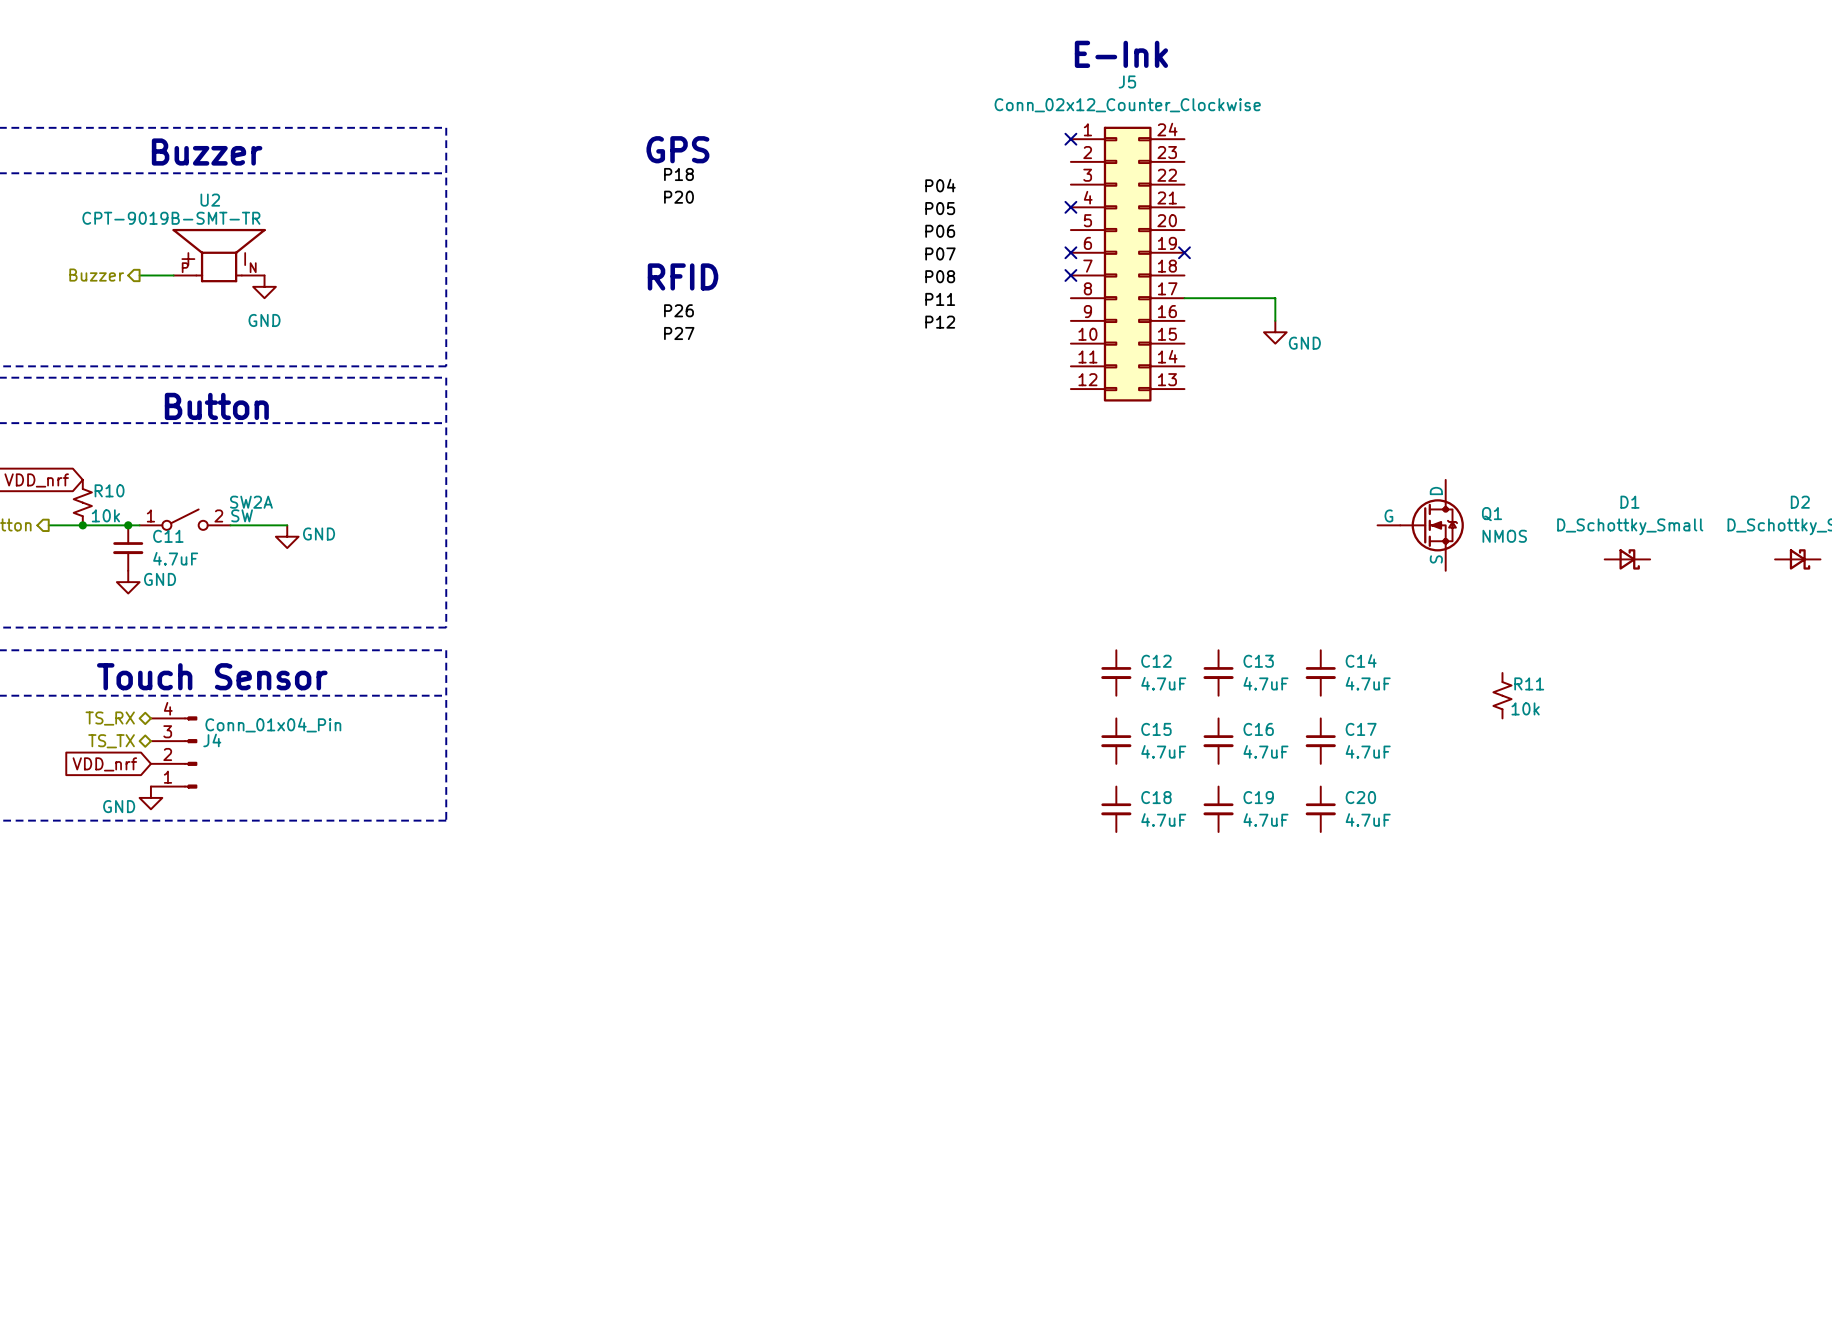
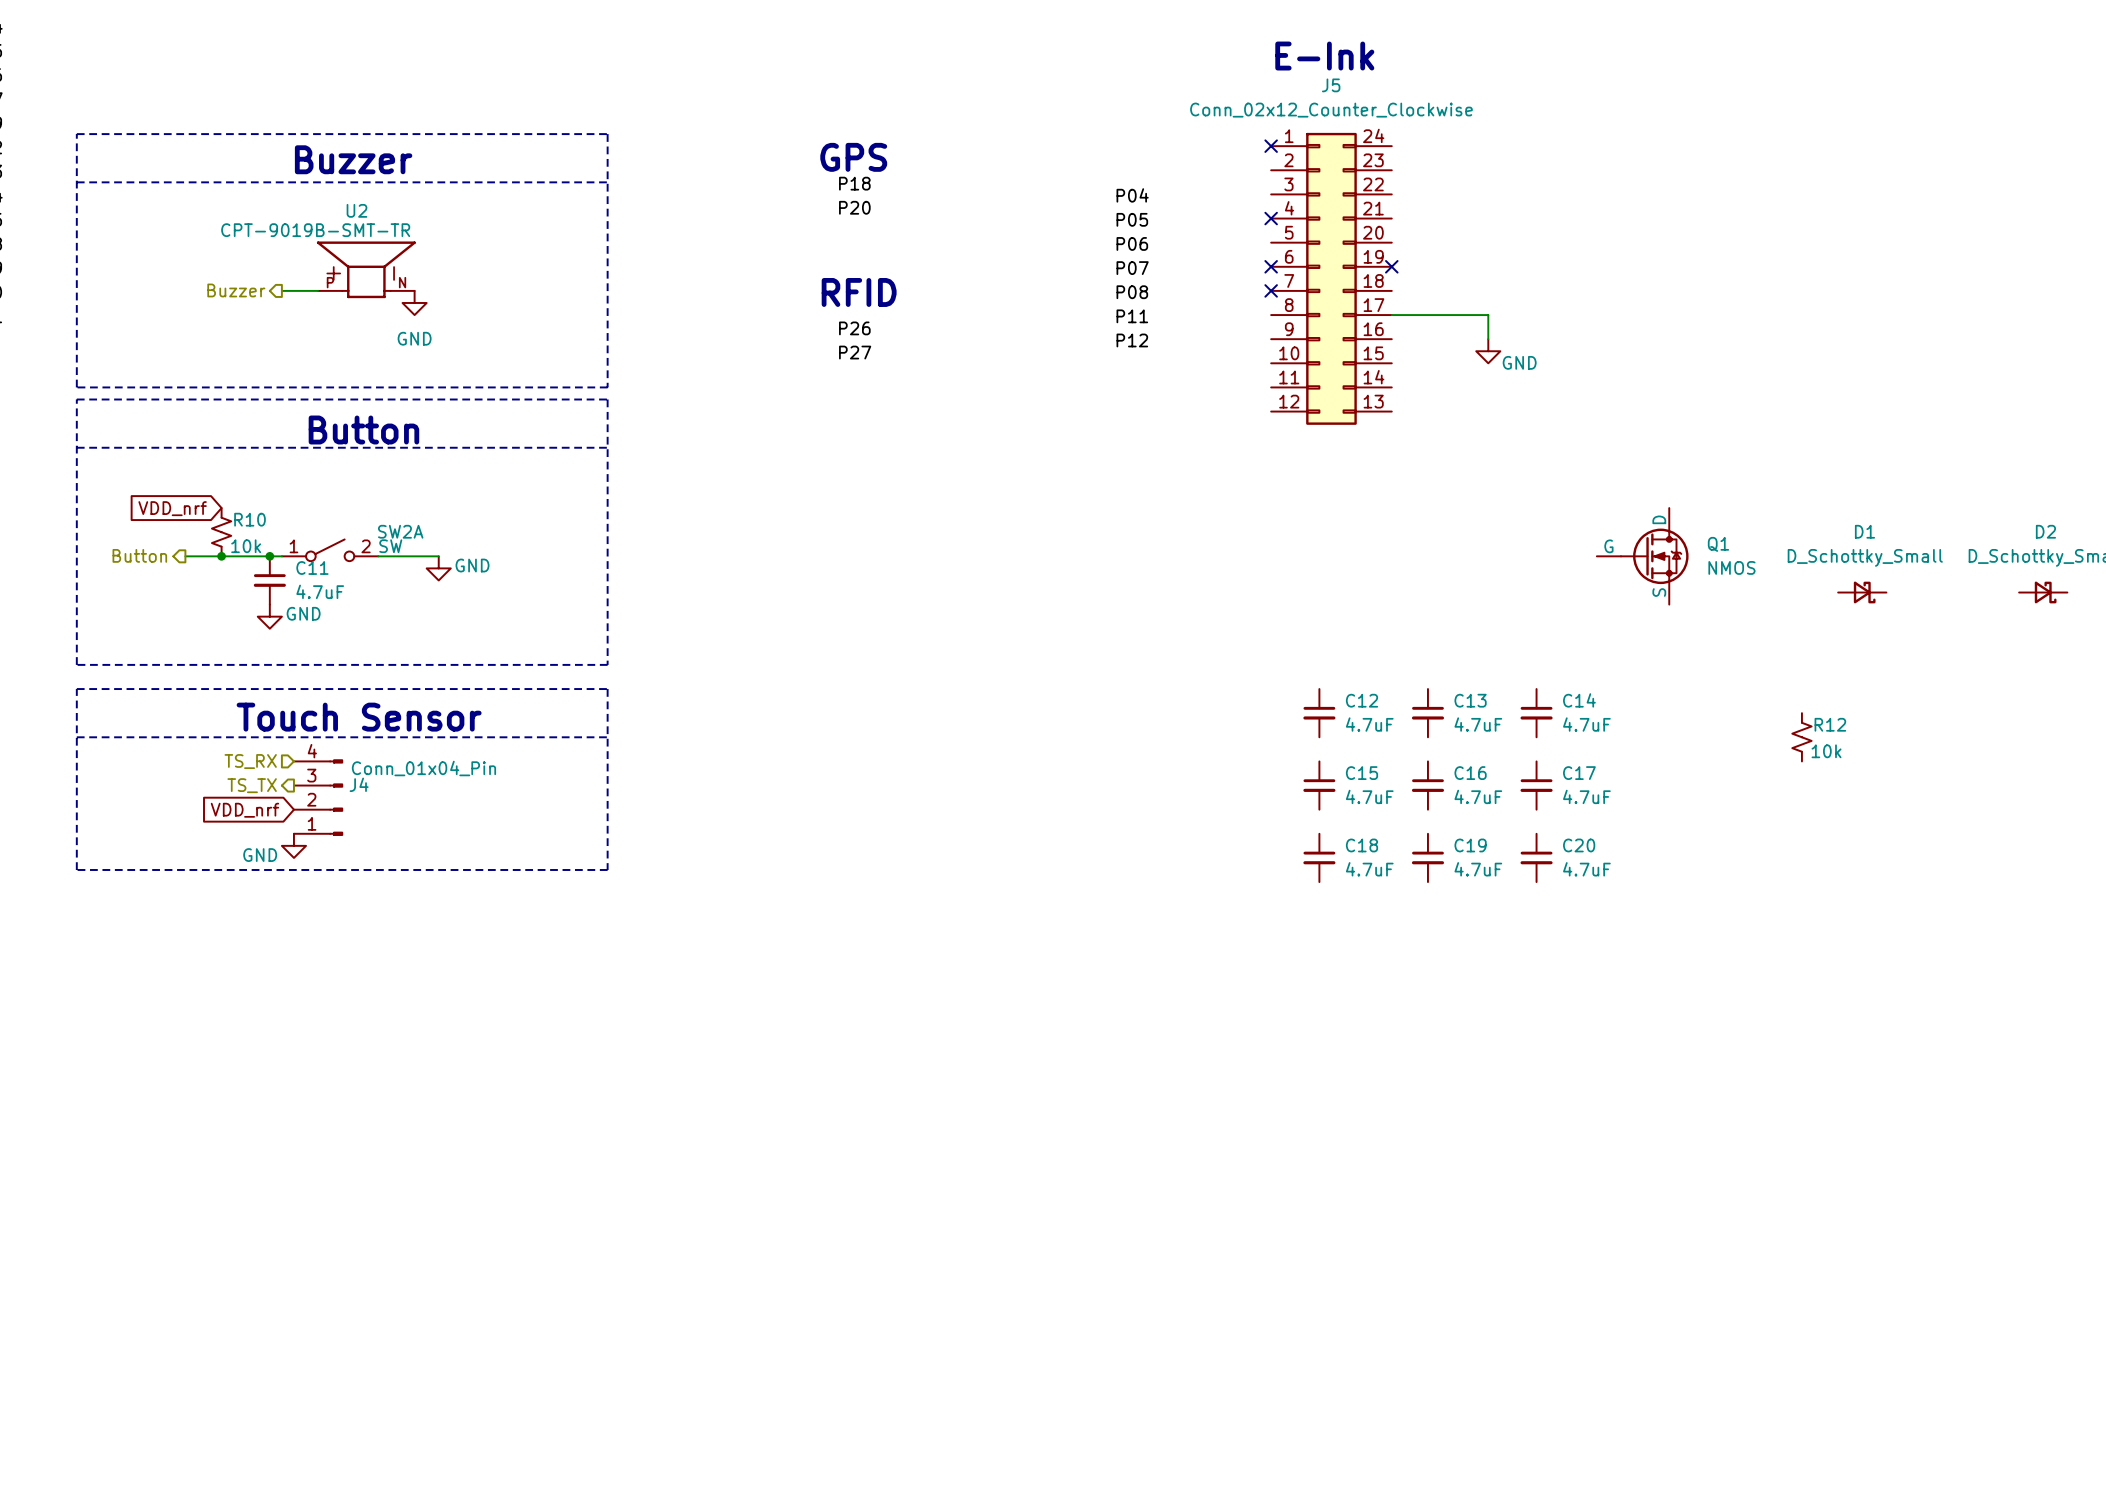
R11: 10k (1502, 695) -> none
R12: none -> 10k (1801, 737)
hierarchical label shape: bidirectional (110, 718) -> input (250, 761)
hierarchical label shape: bidirectional (111, 741) -> output (252, 785)

